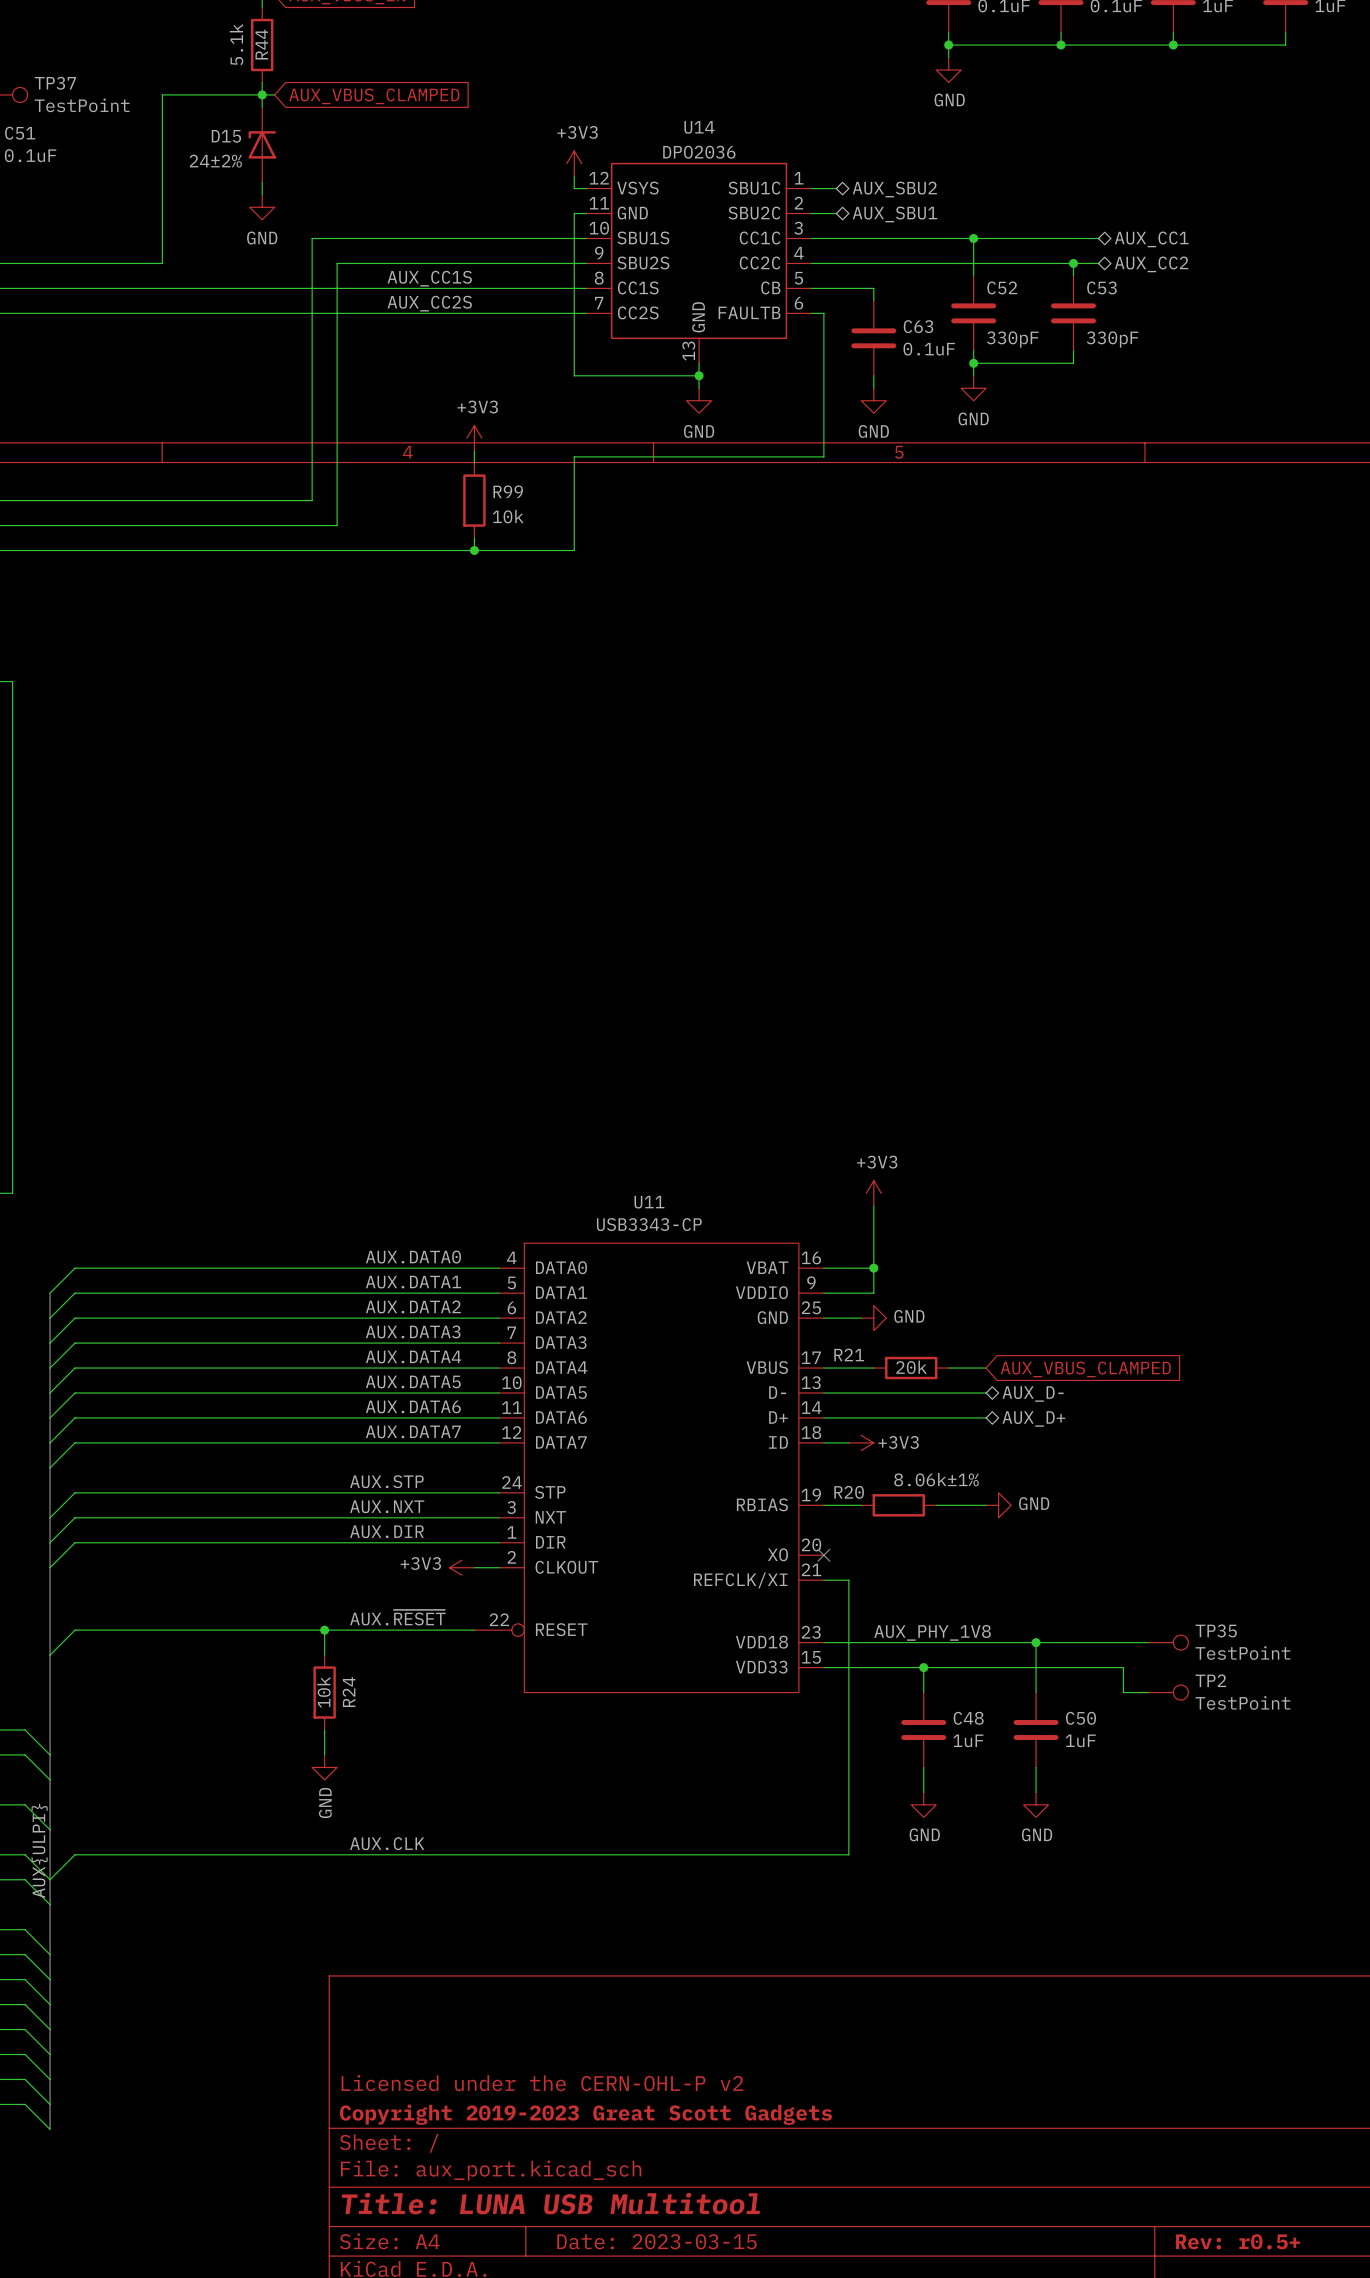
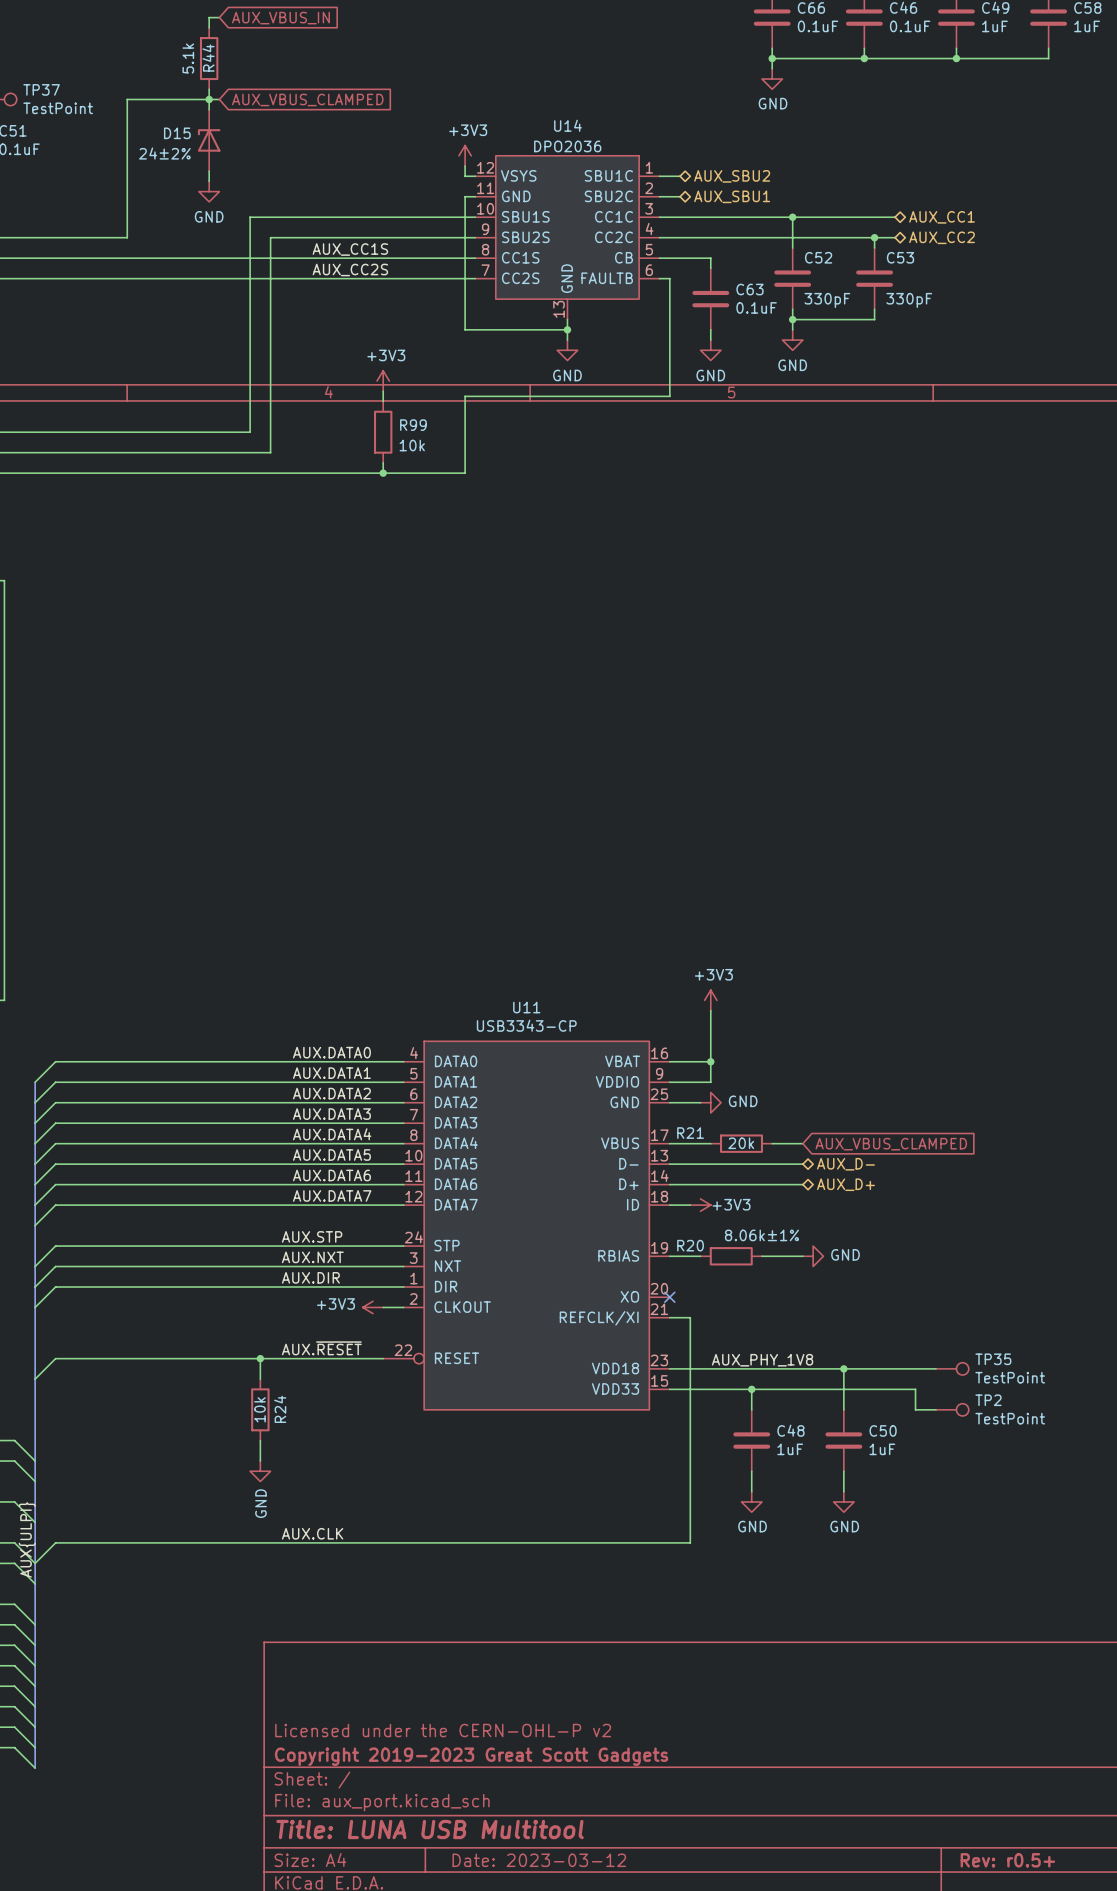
title block: Date: 2023-03-15 (656, 2241) -> Date: 2023-03-12 (539, 1860)

